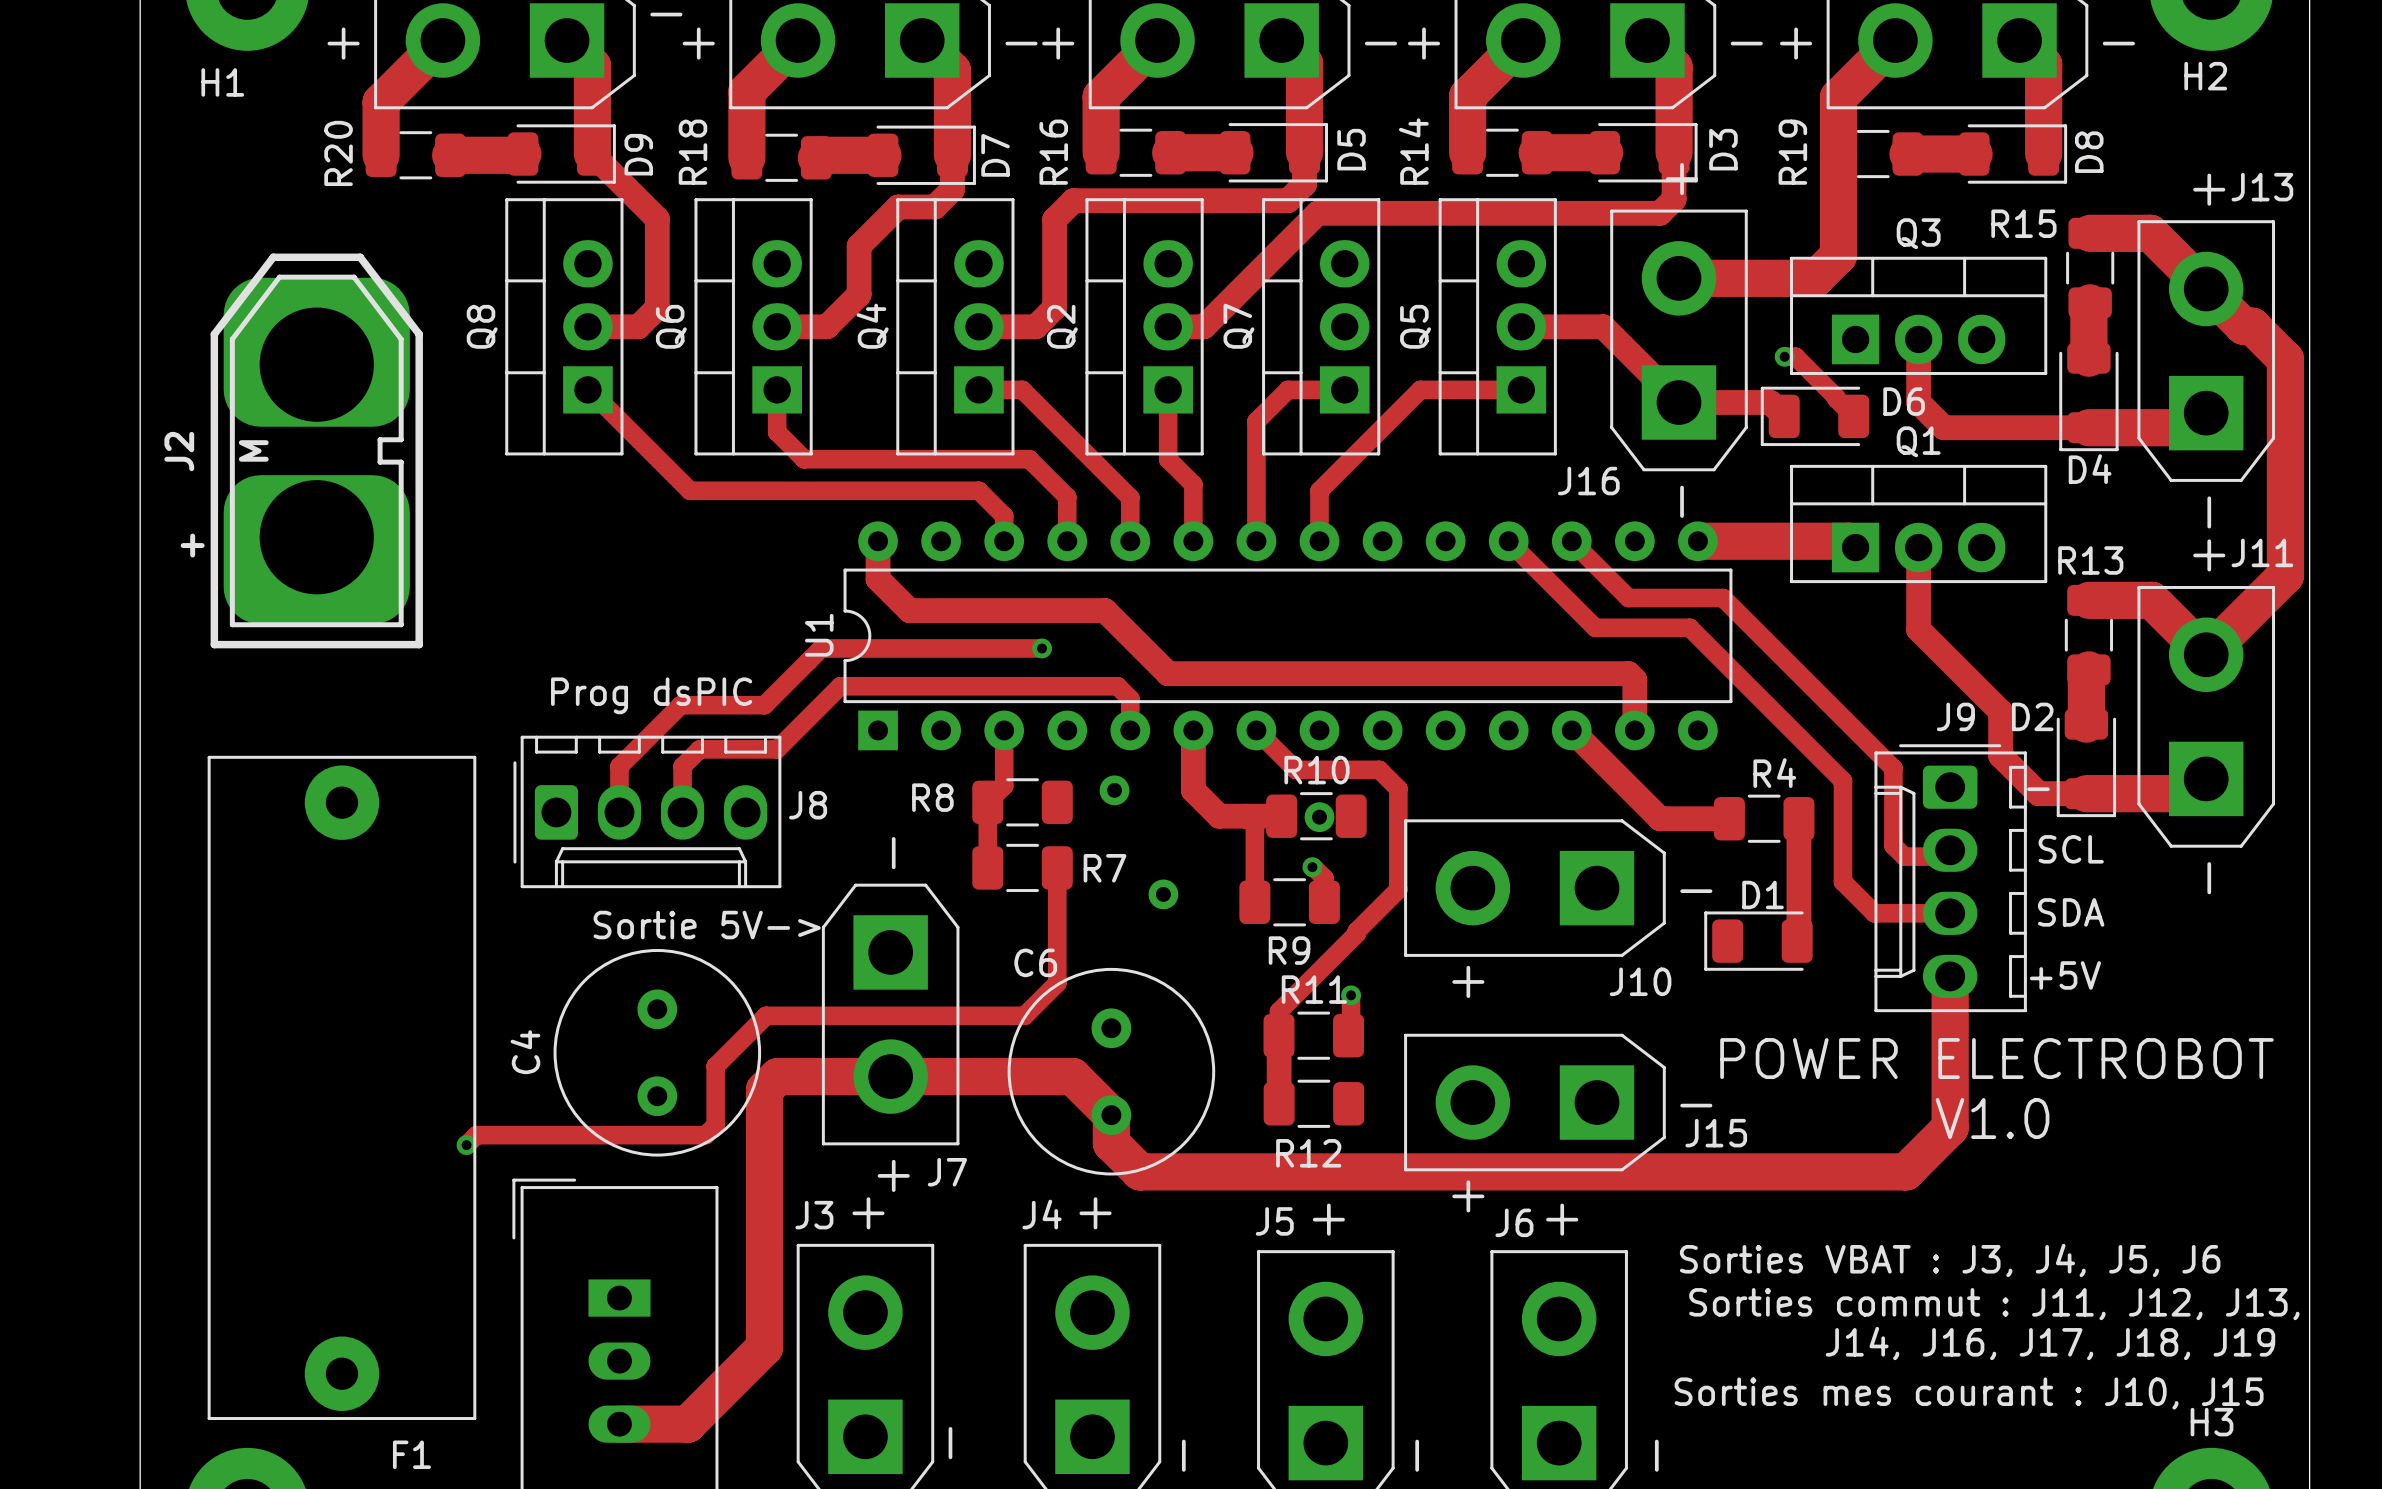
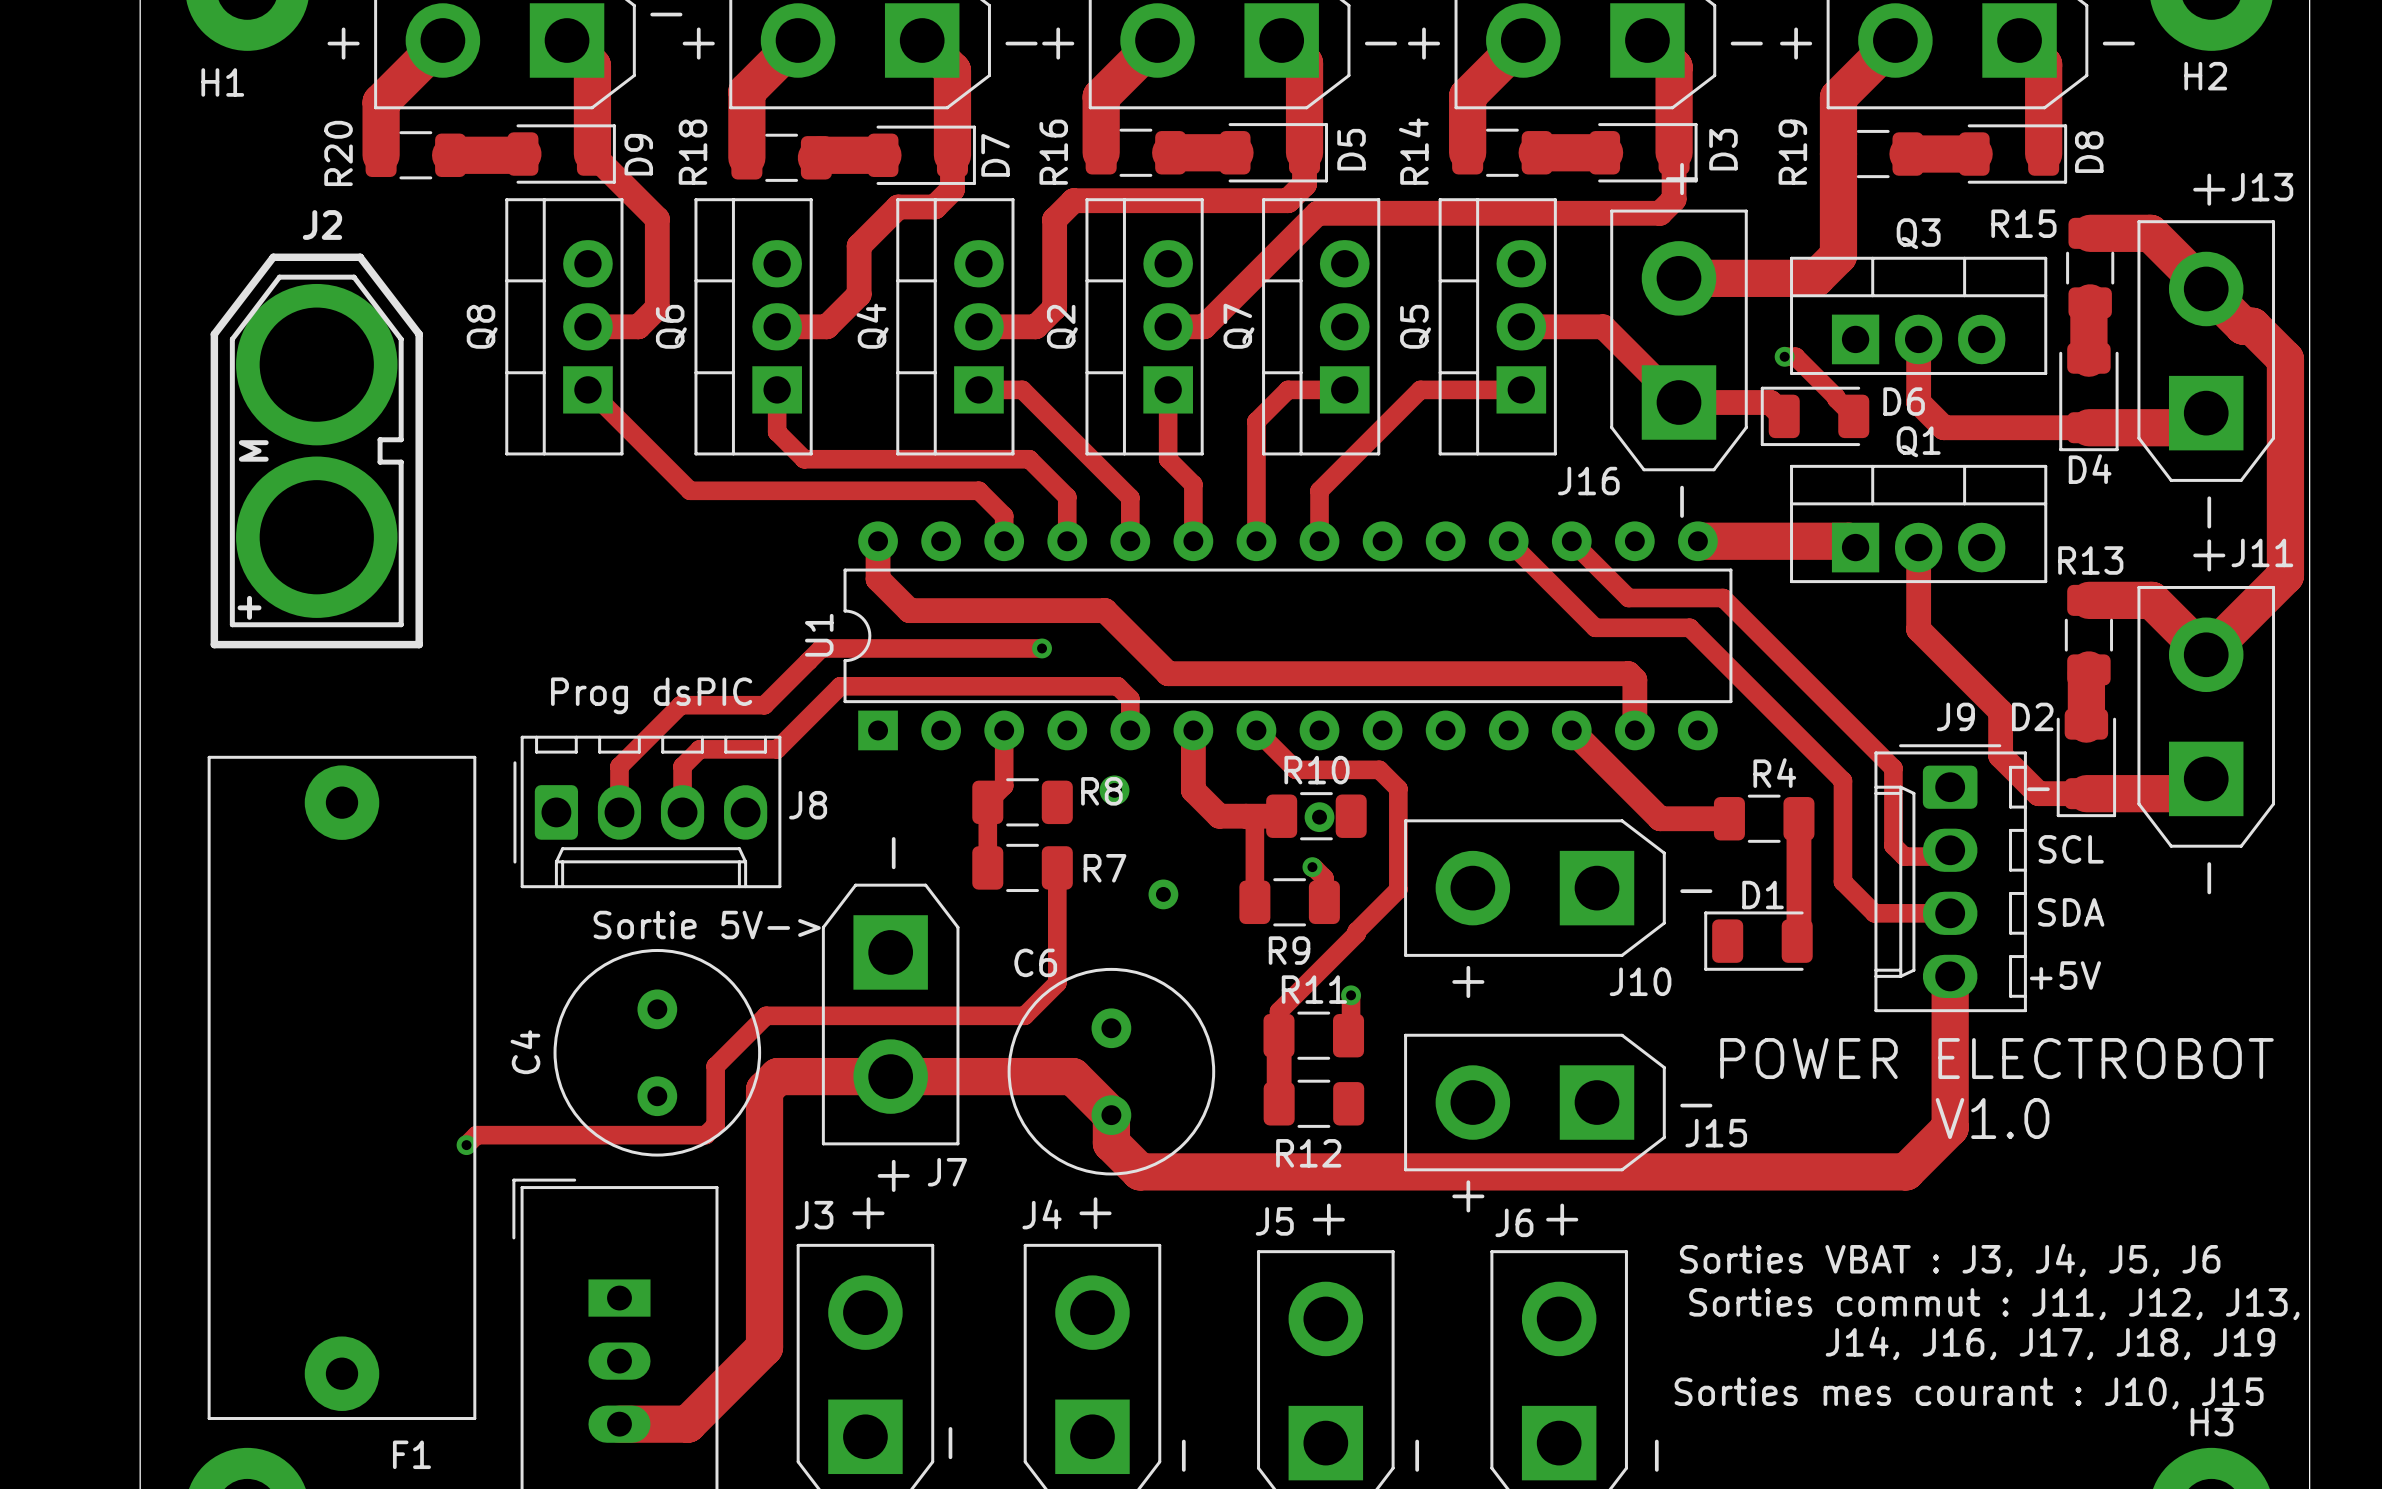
J2 footprint: [210, 253, 423, 649] -> [210, 253, 423, 649]
J2 name position: J2 (179, 451) -> J2 (322, 224)
R8 name position: R8 (932, 797) -> R8 (1101, 791)

